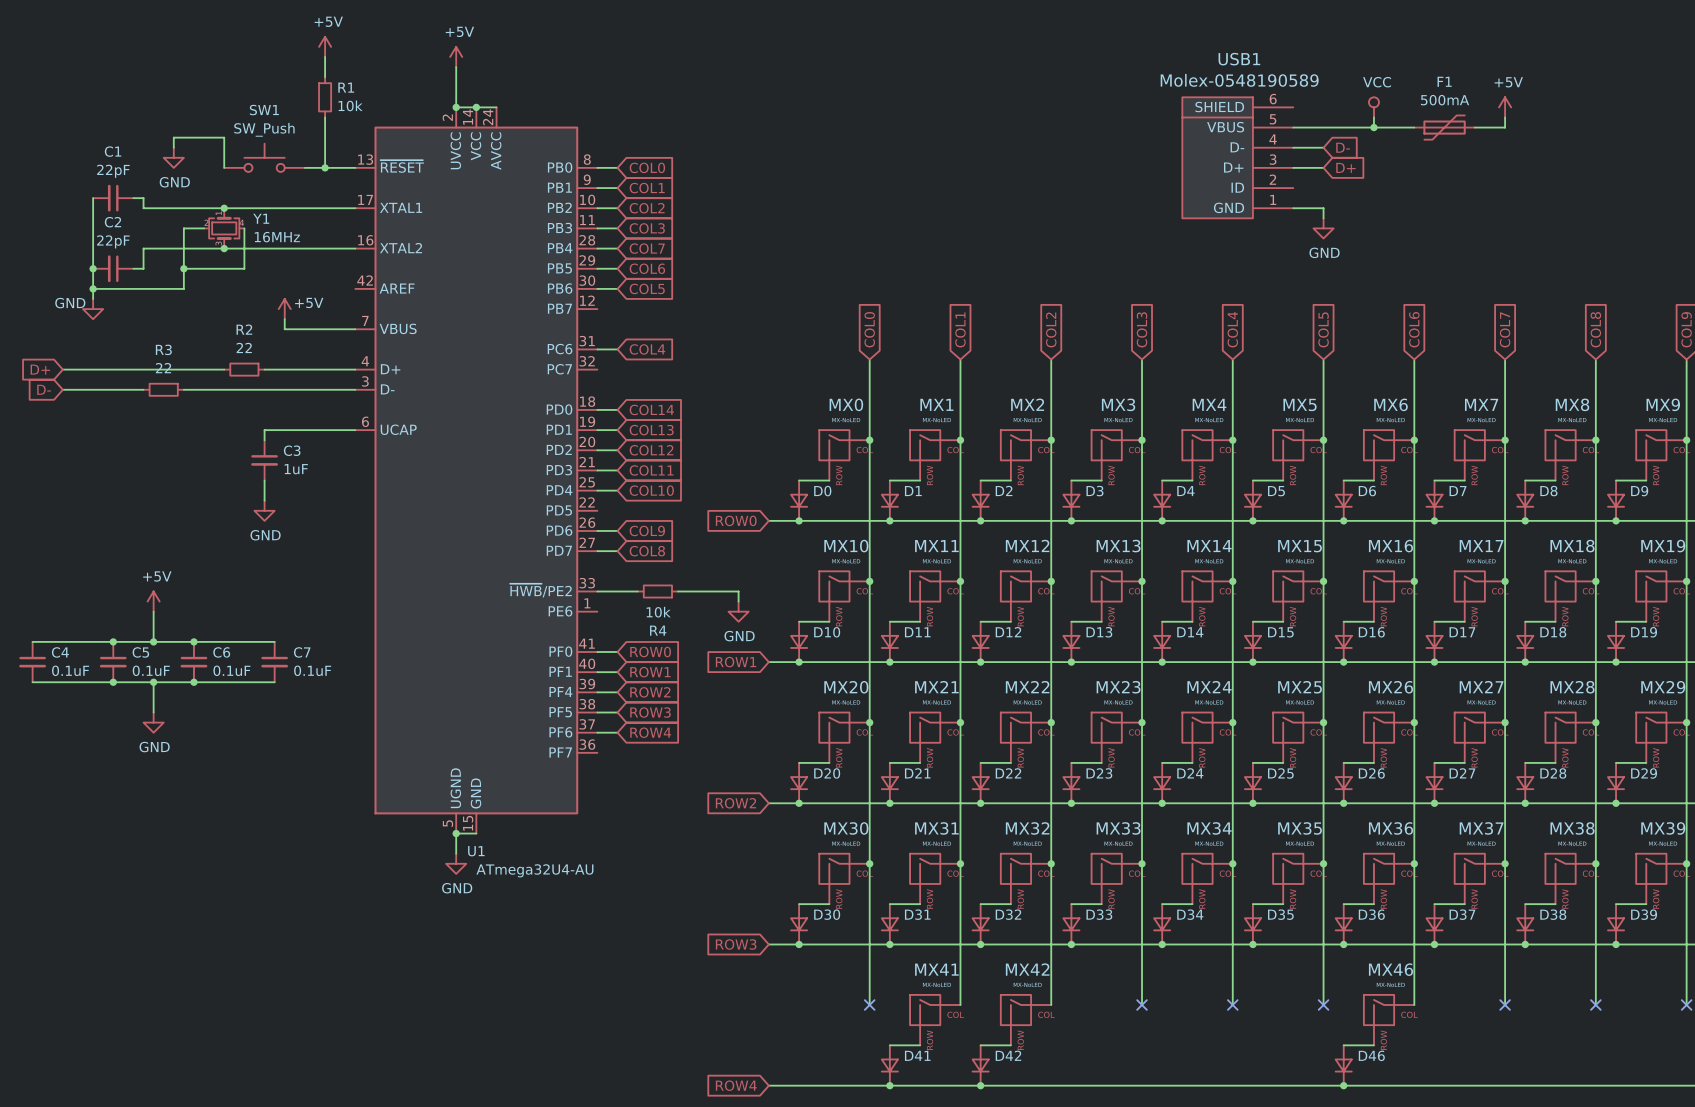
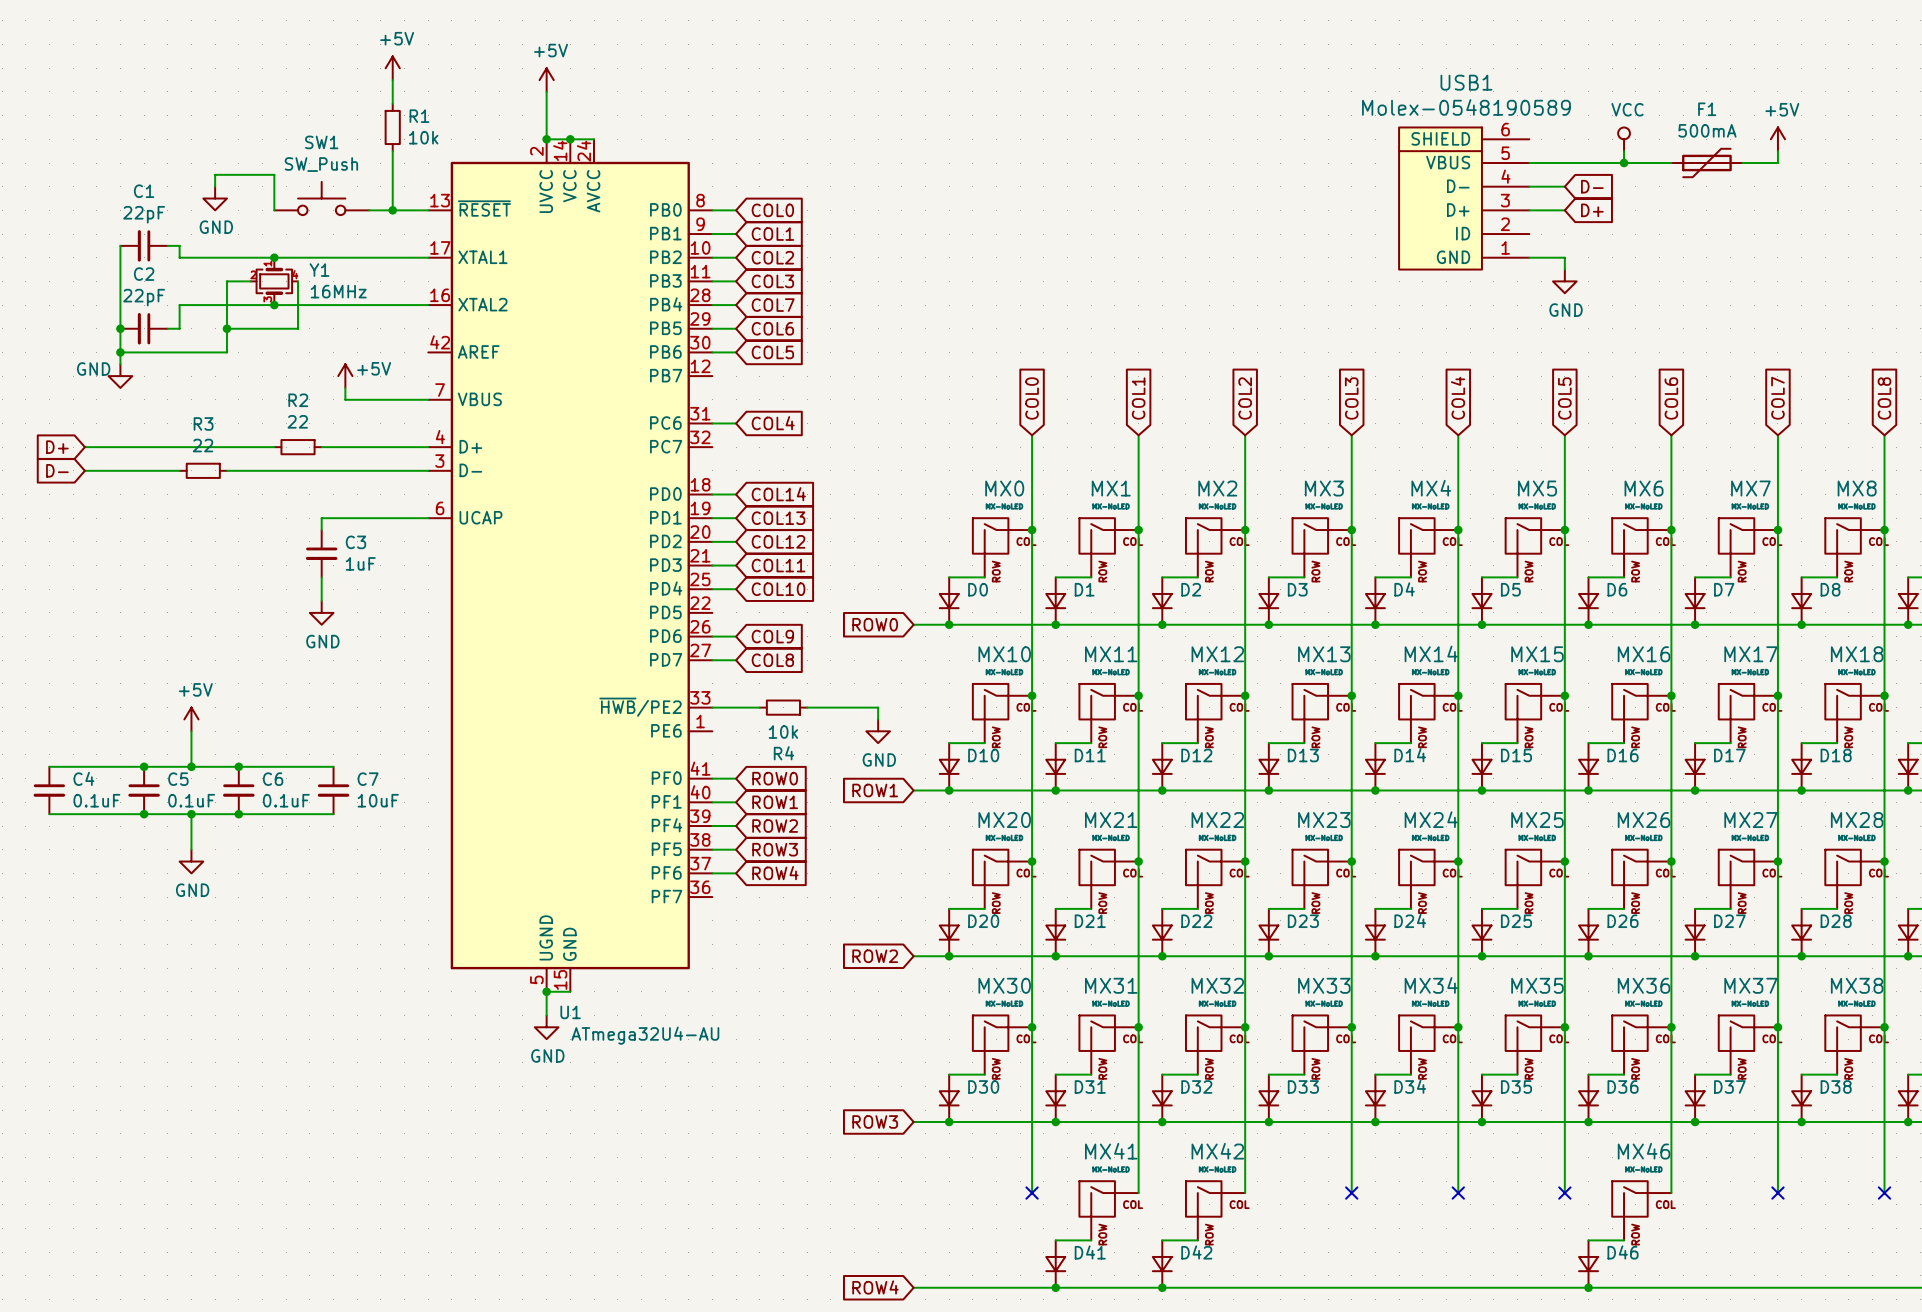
C7 value: 0.1uF (312, 670) -> 10uF (378, 800)

